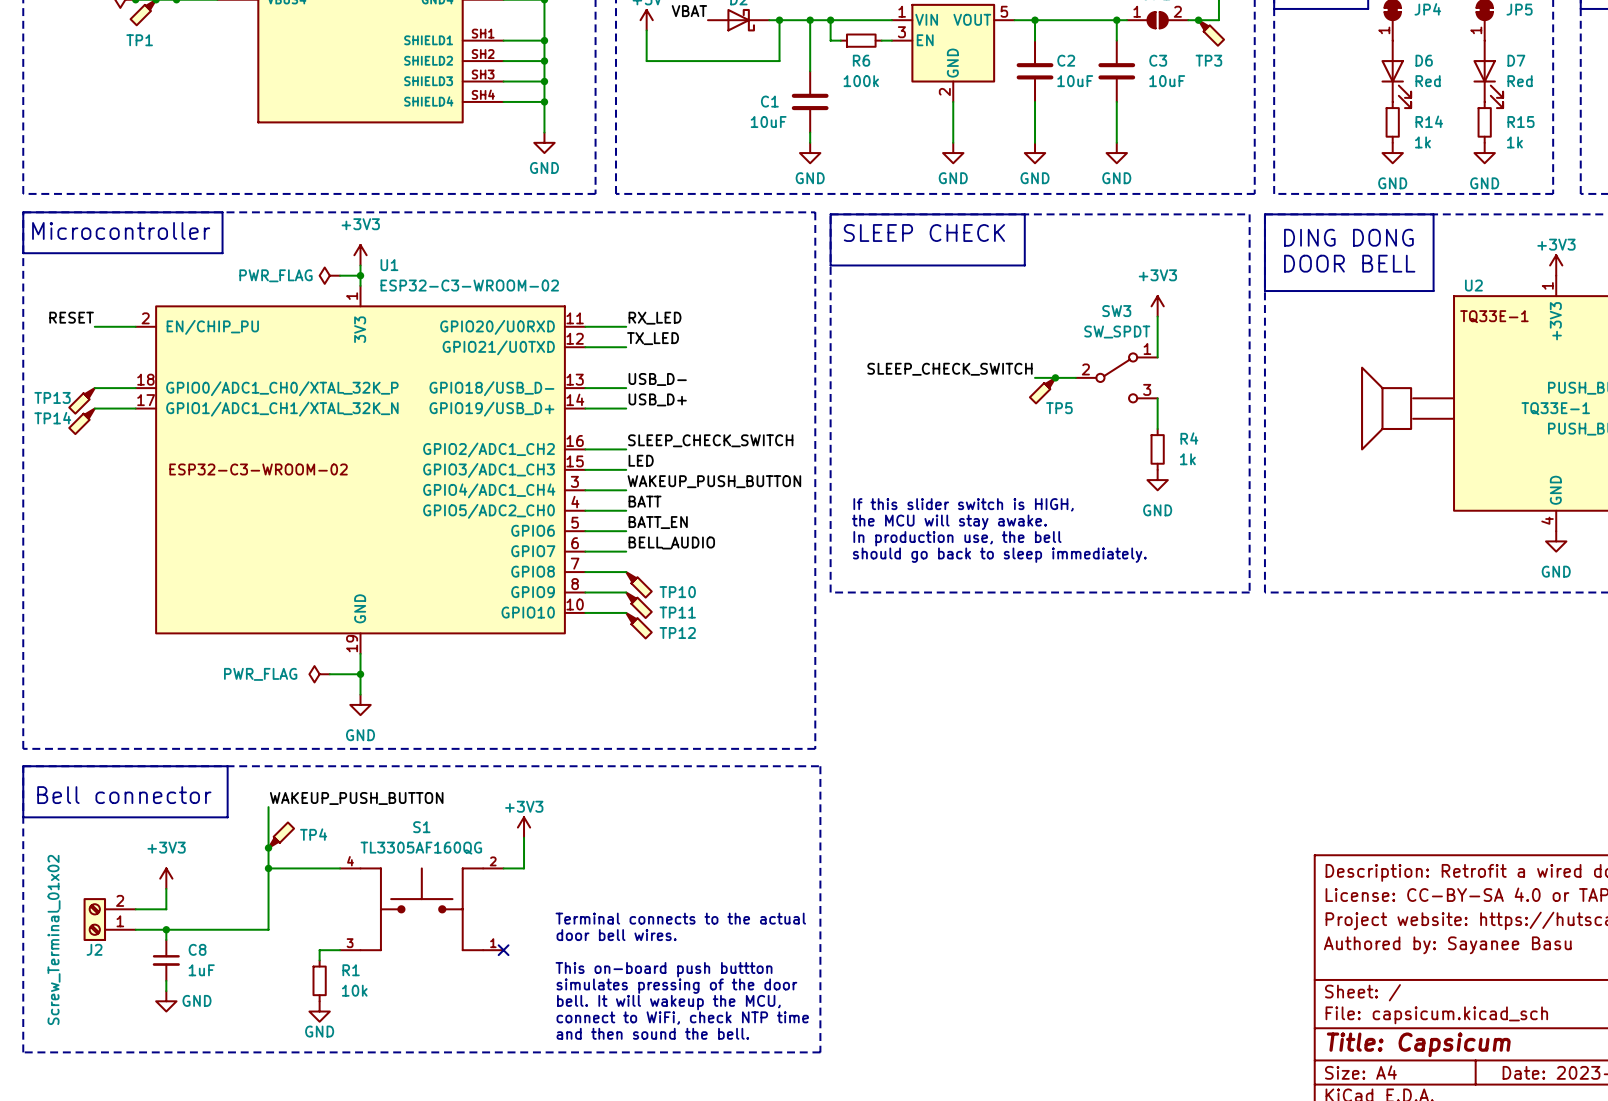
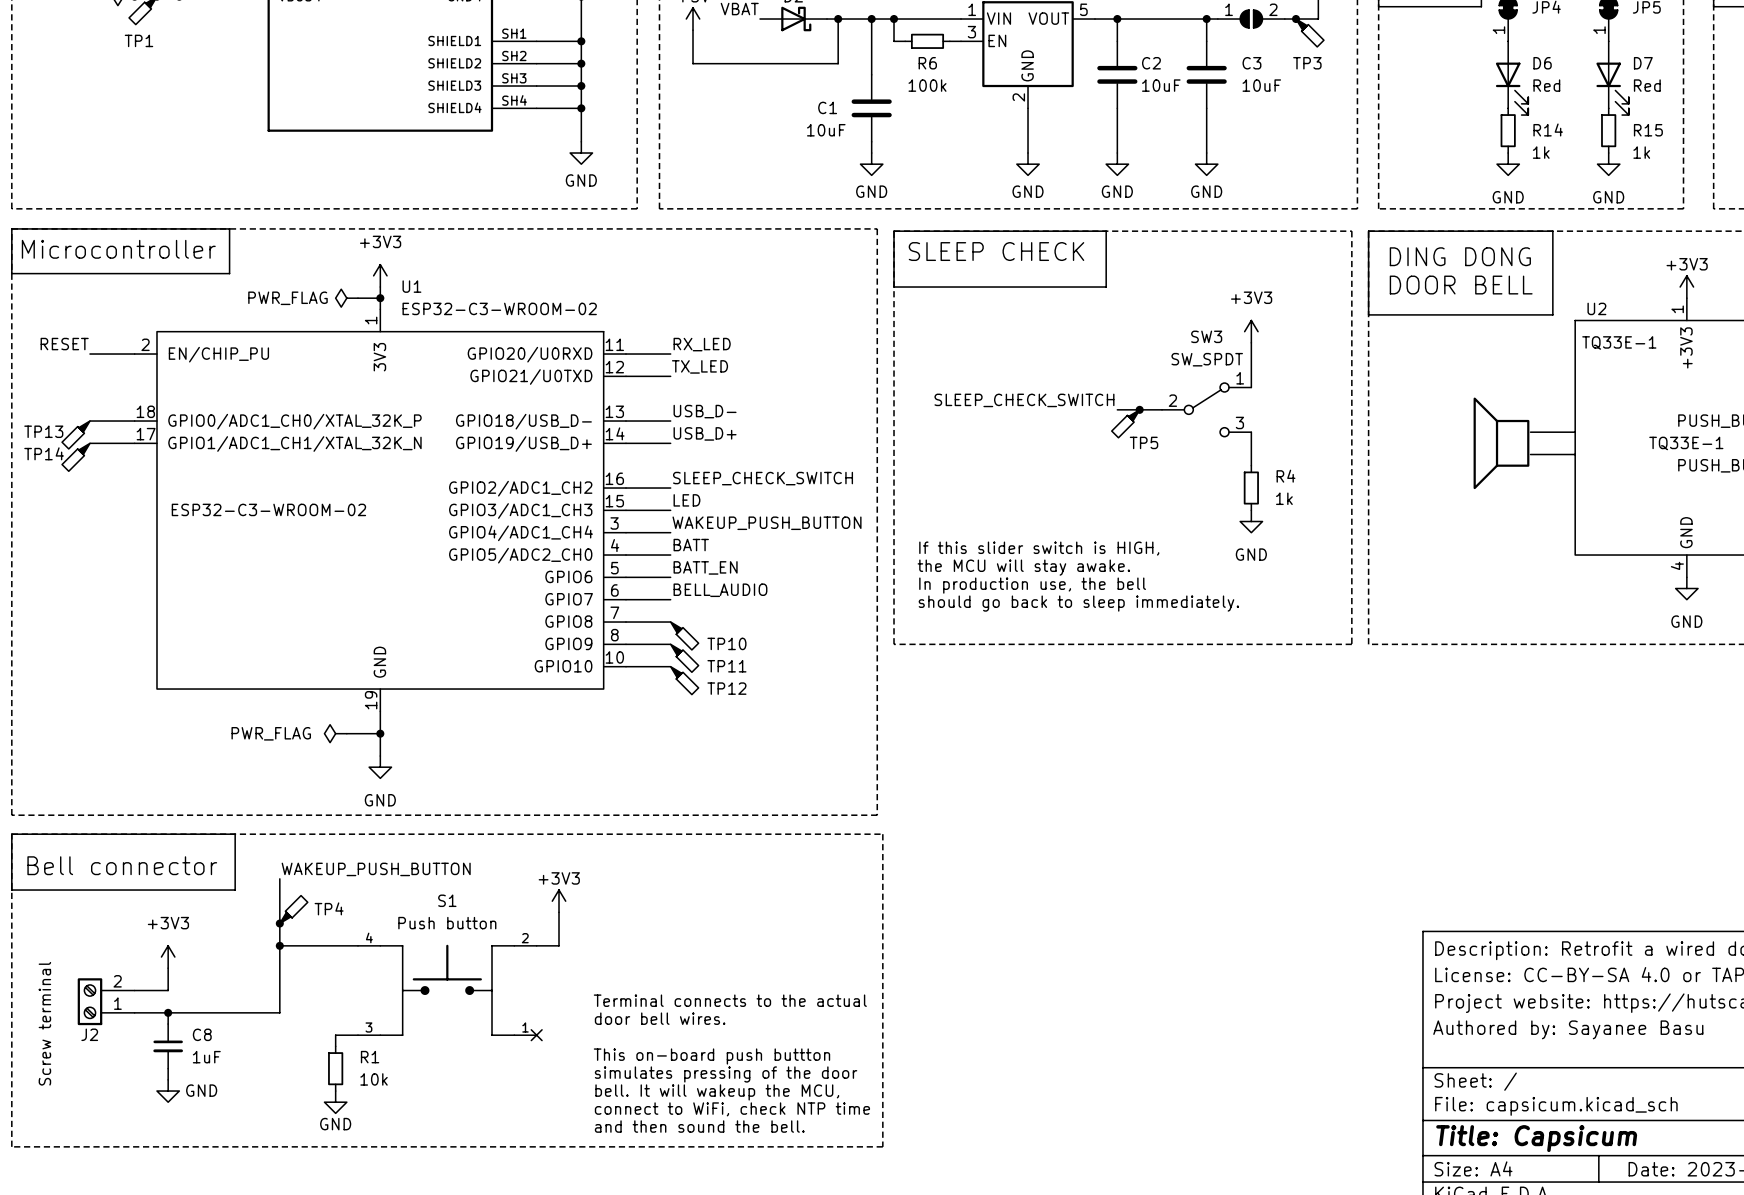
S1 value: TL3305AF160QG (421, 848) -> Push button (447, 923)
J2 value: Screw_Terminal_01x02 (54, 939) -> Screw terminal (44, 1023)

